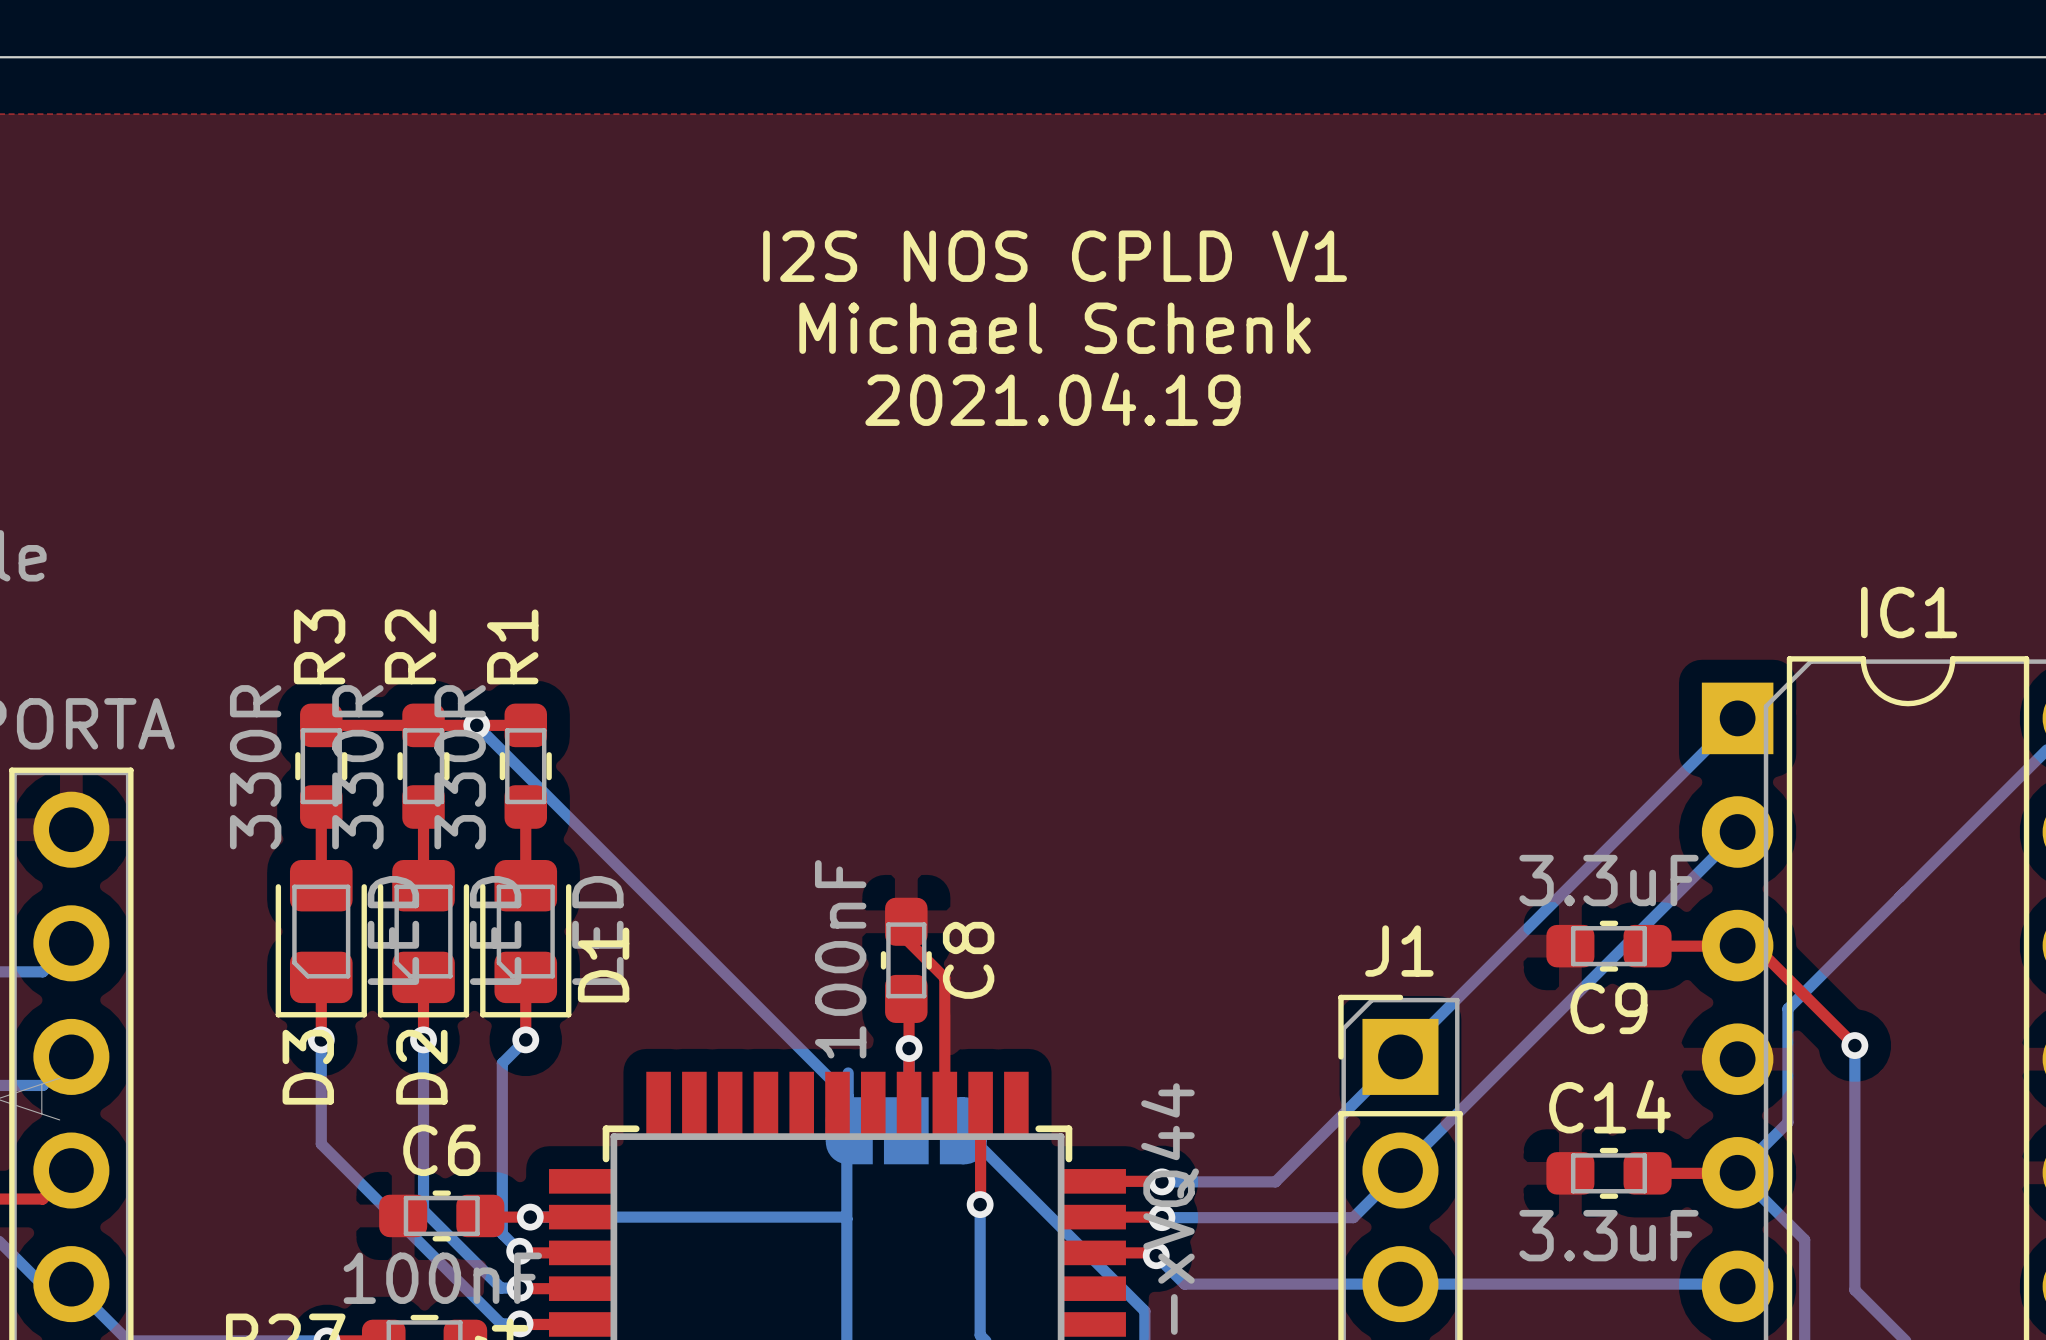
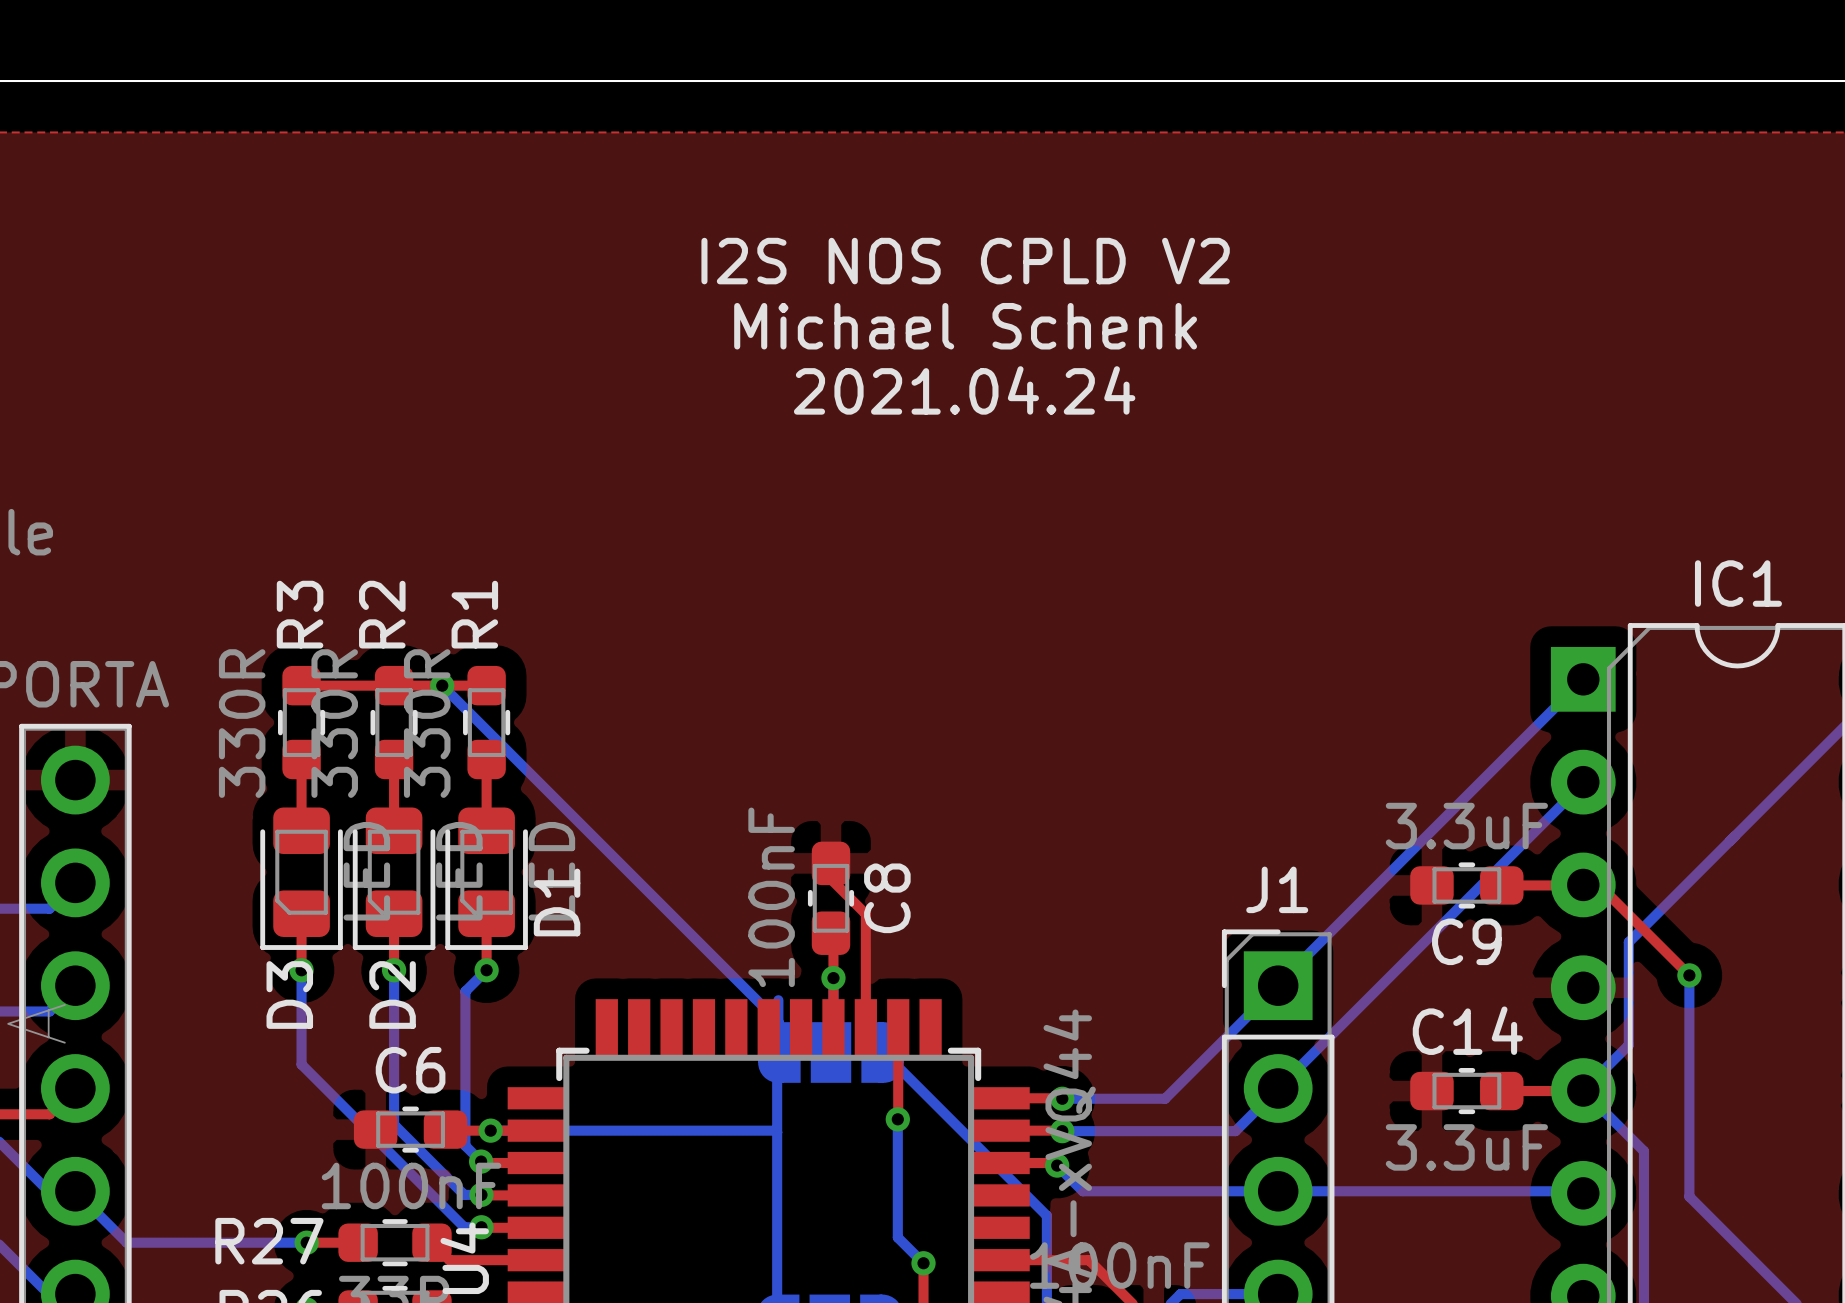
text: I2S NOS CPLD V1 (1055, 256) -> I2S NOS CPLD V2 (965, 261)
text: 2021.04.19 (1052, 399) -> 2021.04.24 (964, 390)

